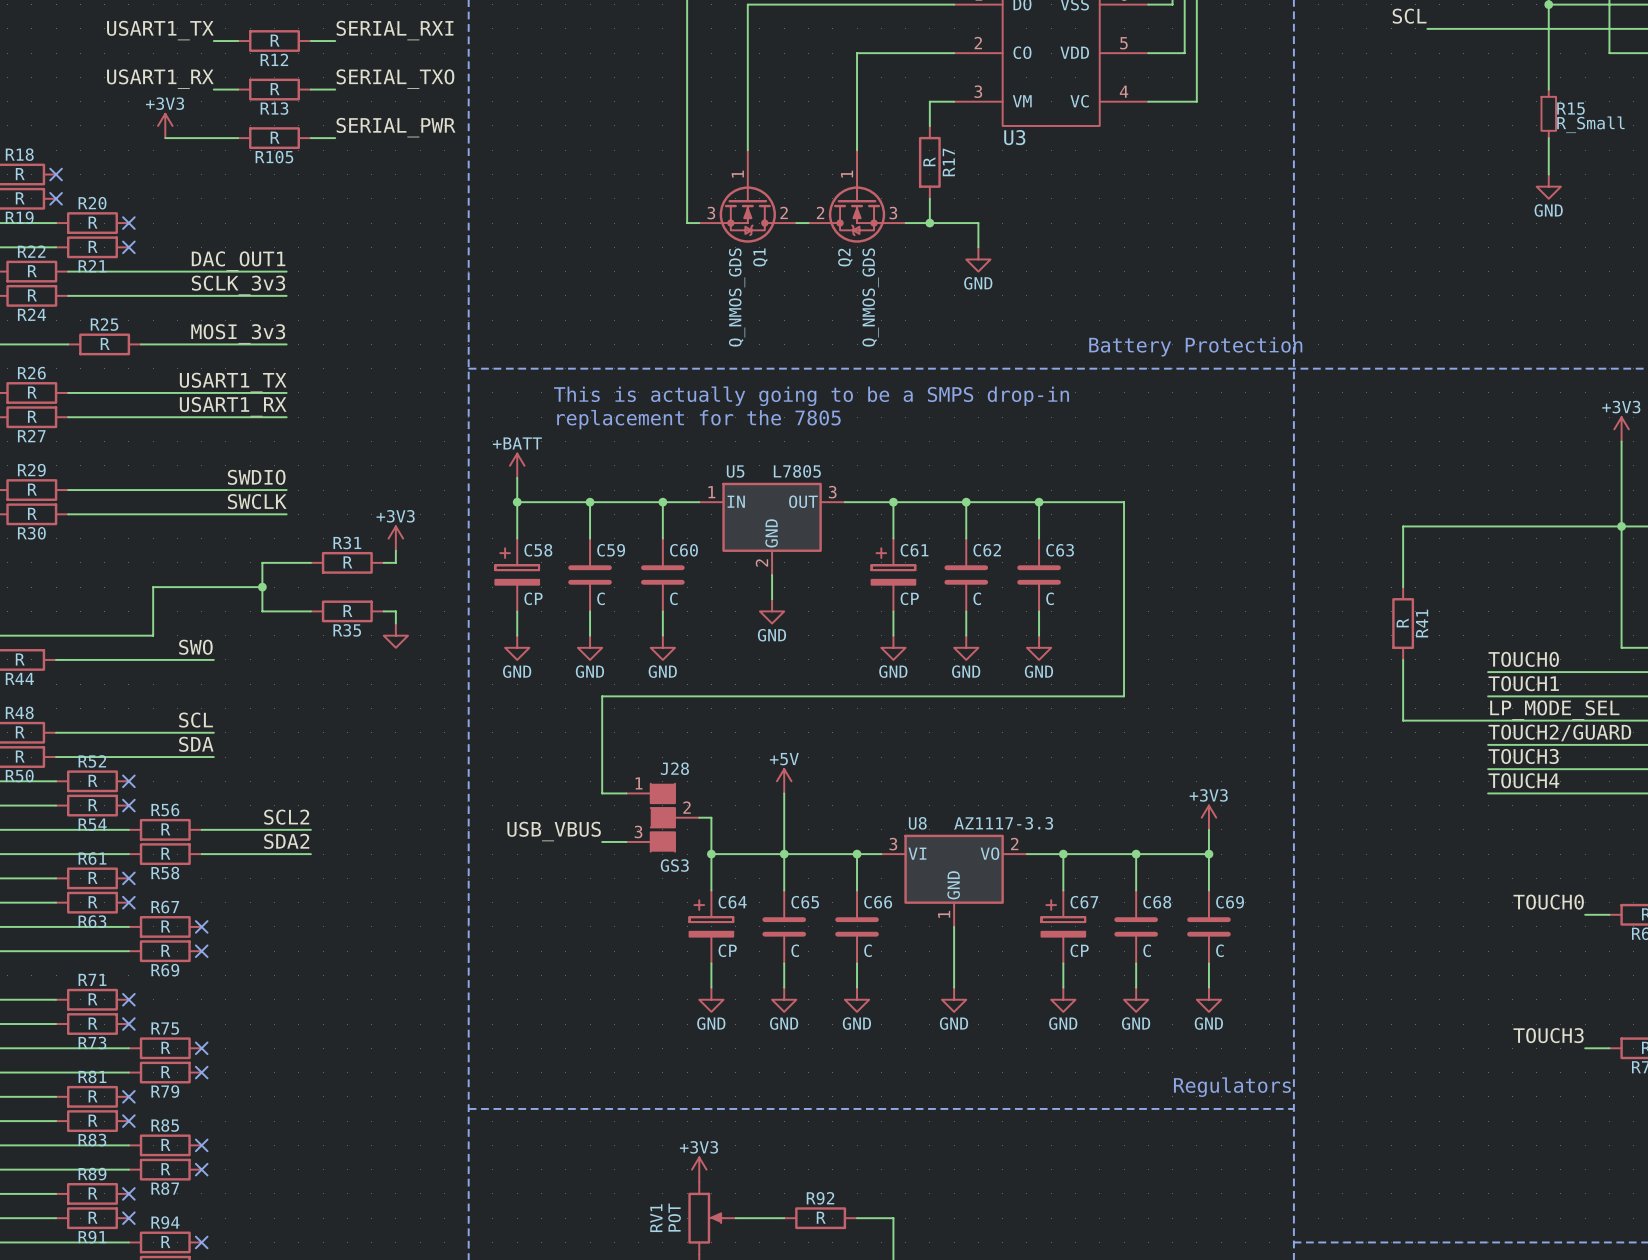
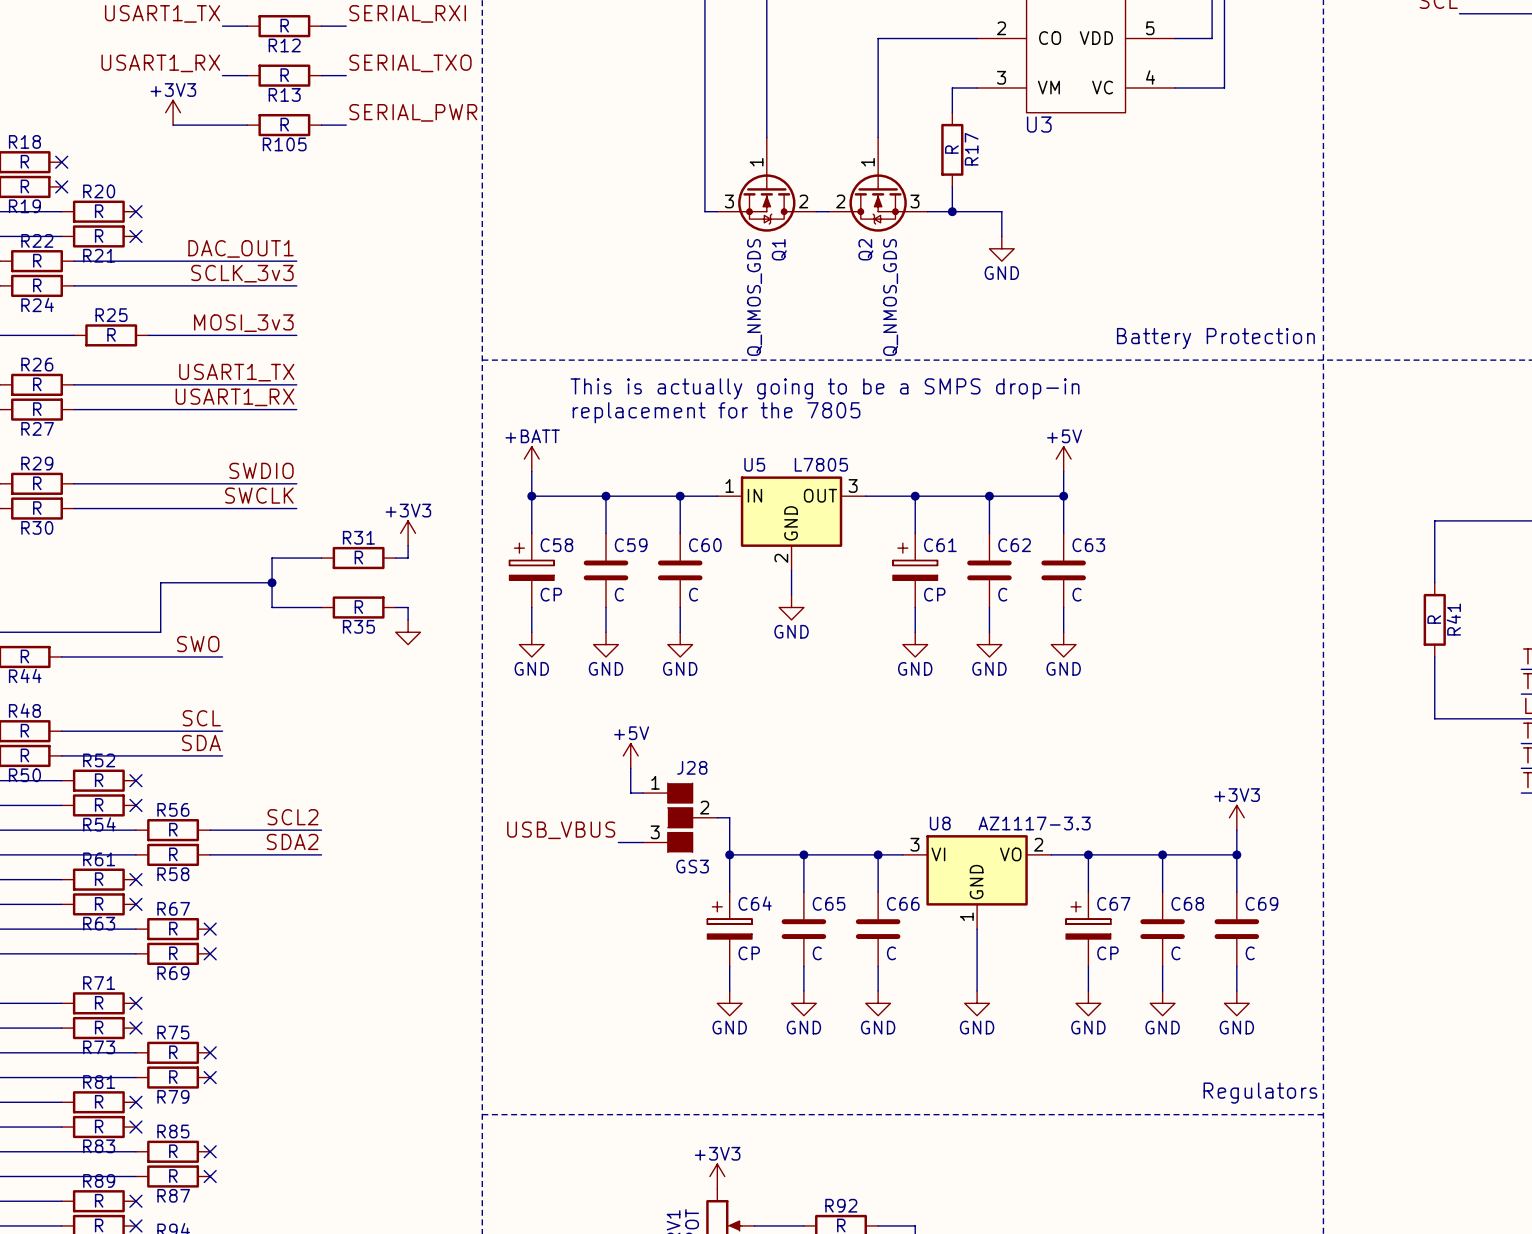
power symbol: none -> +5V (1063, 459)
wire: none -> (1063, 471) (1063, 496)
wire: (1039, 502) (1124, 502) (1124, 696) (602, 696) (602, 793) (614, 793) -> (630, 768) (630, 793)
power symbol position: +5V (784, 781) -> +5V (630, 755)
wire: (784, 793) (784, 854) -> none

